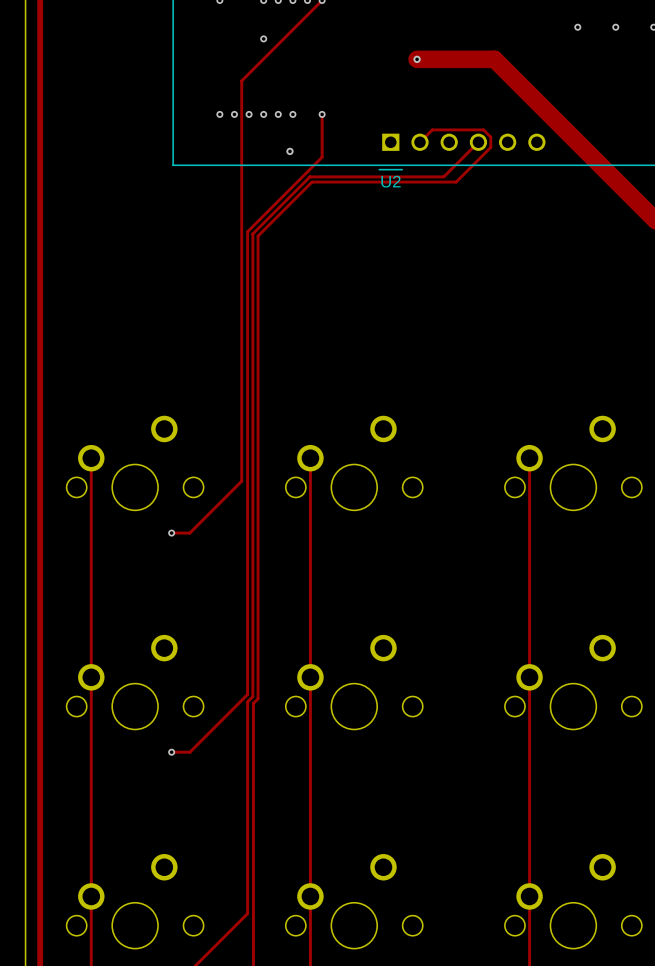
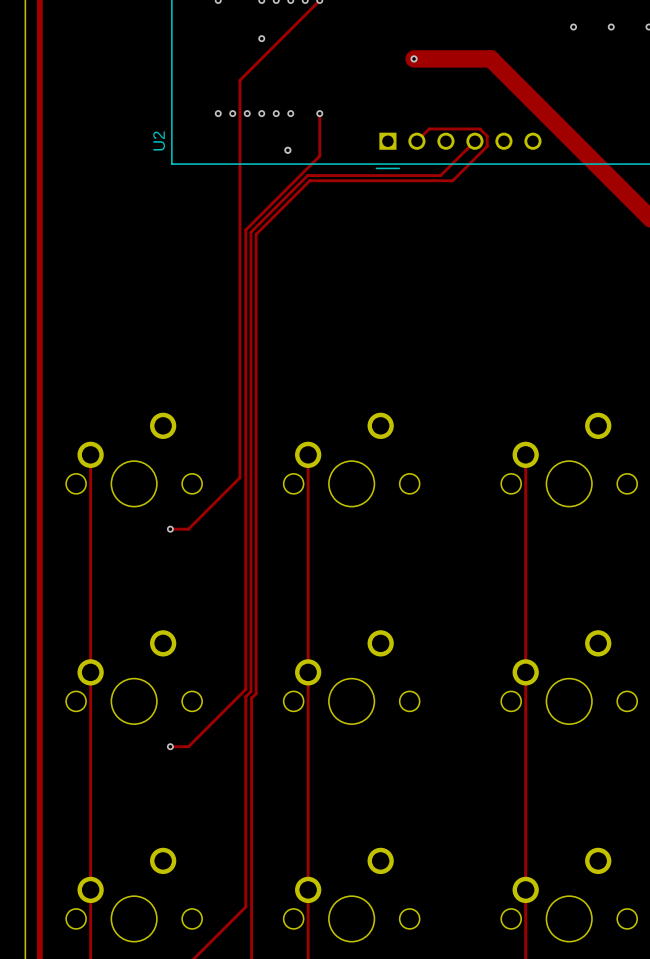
U2 name rotation: 0° (391, 181) -> 90° counterclockwise (159, 141)
U2 name position: U2 (391, 181) -> U2 (159, 141)

